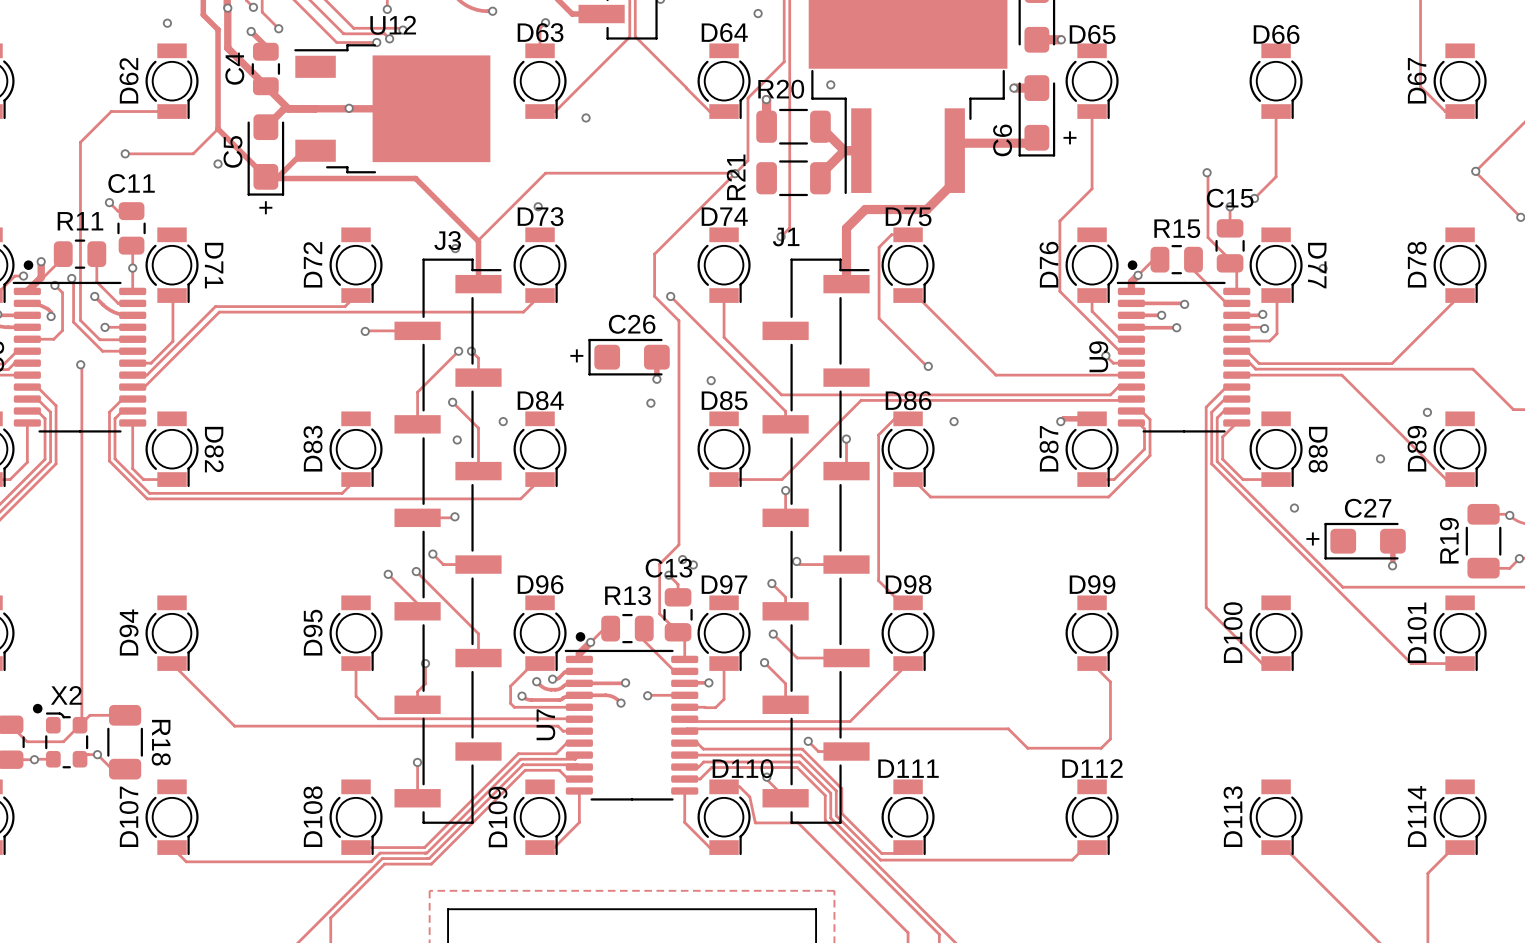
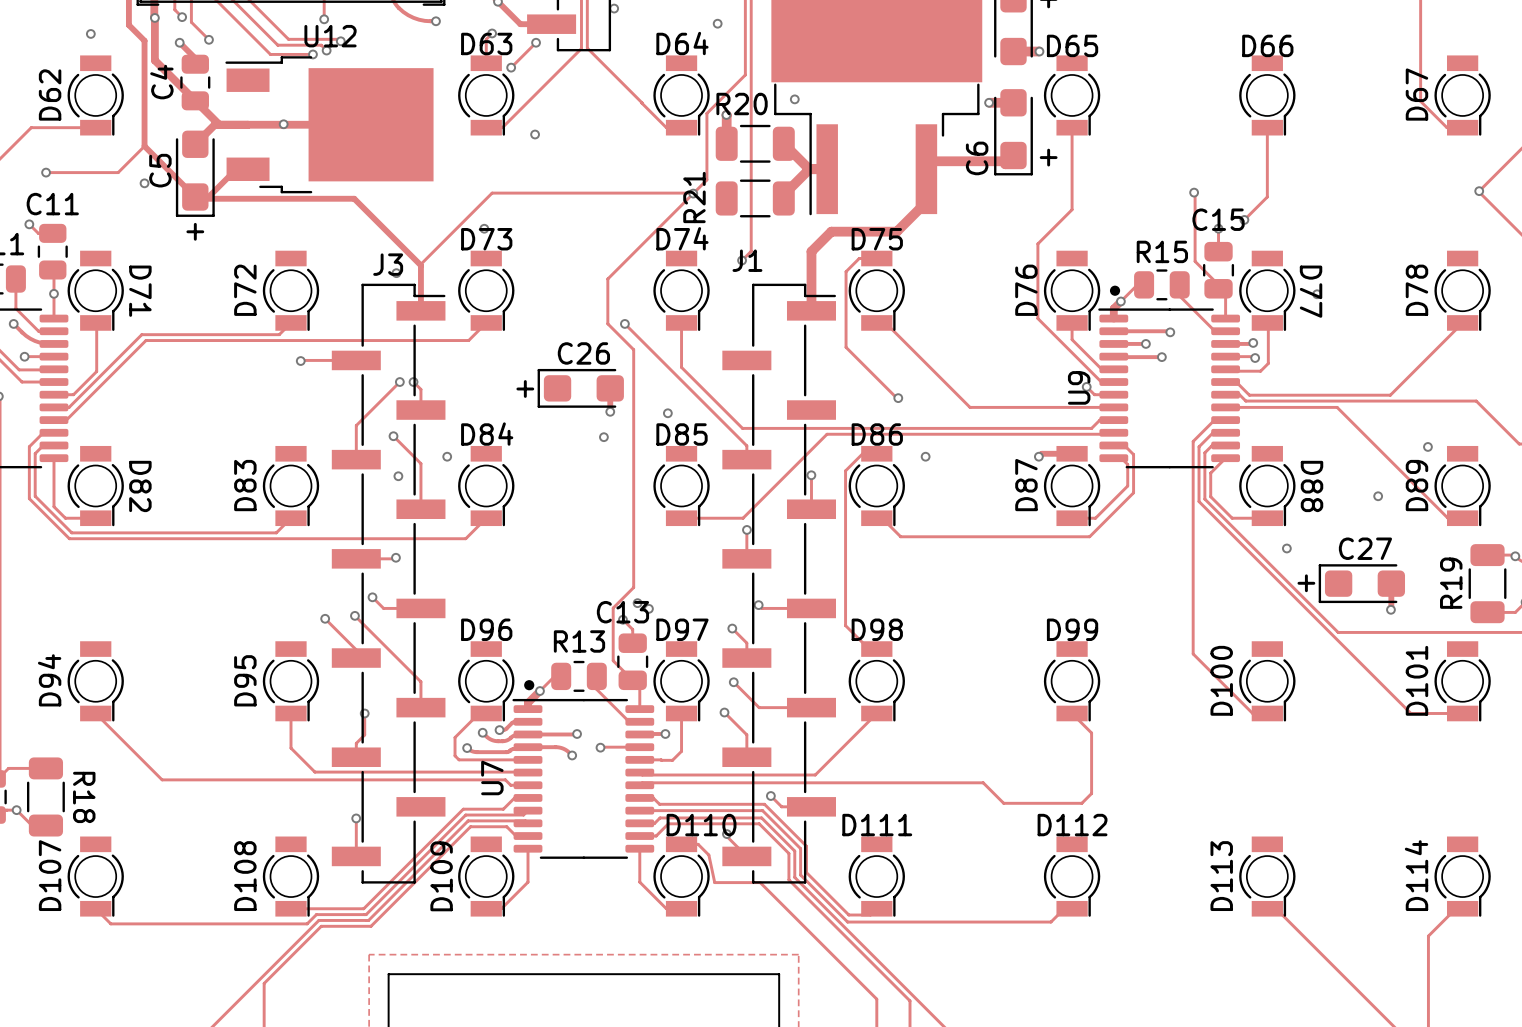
track: none -> (536, 42) (511, 67)
via: none -> (536, 42)
via: none -> (511, 67)

